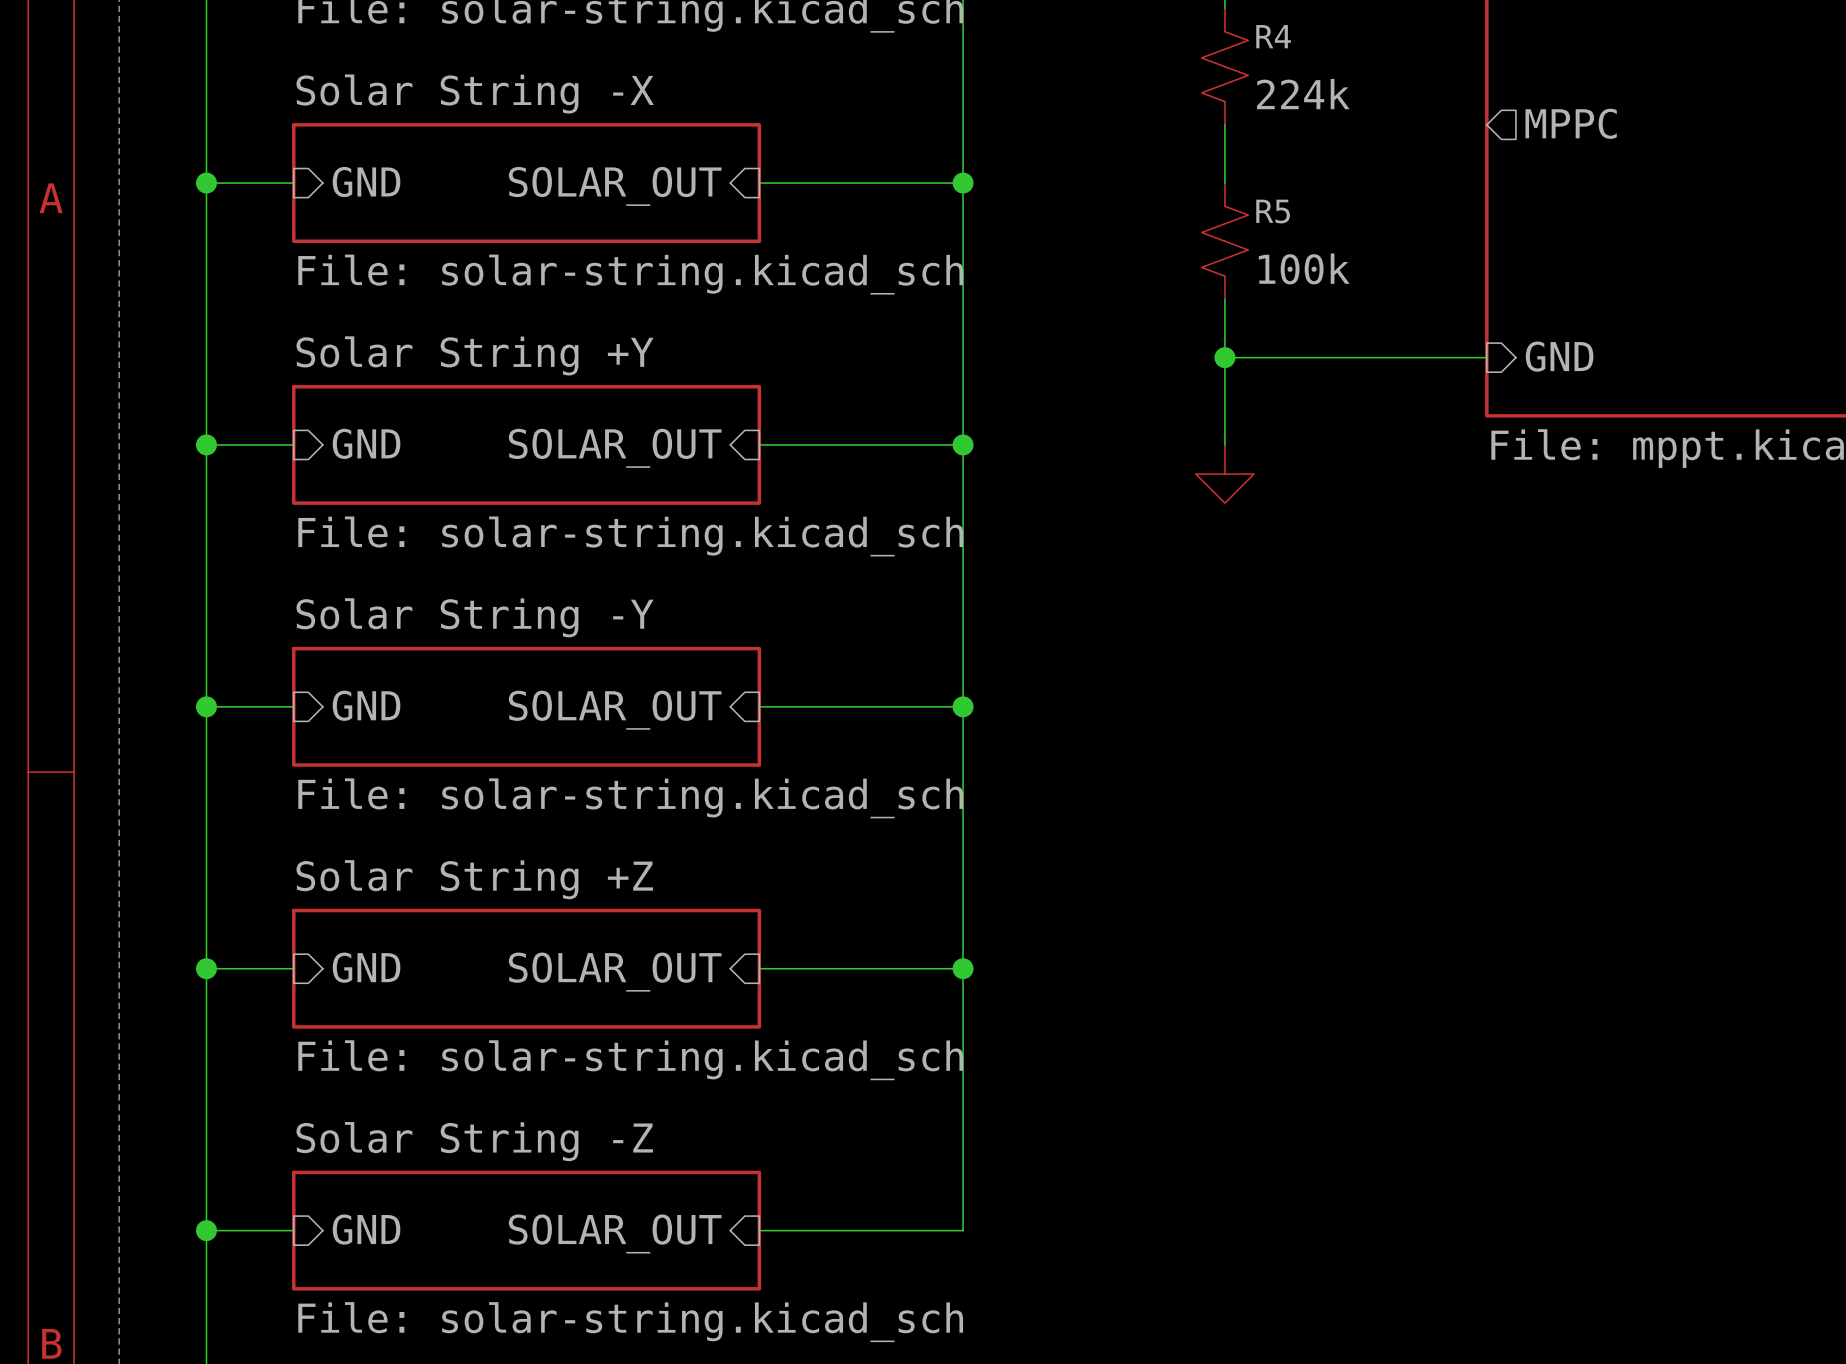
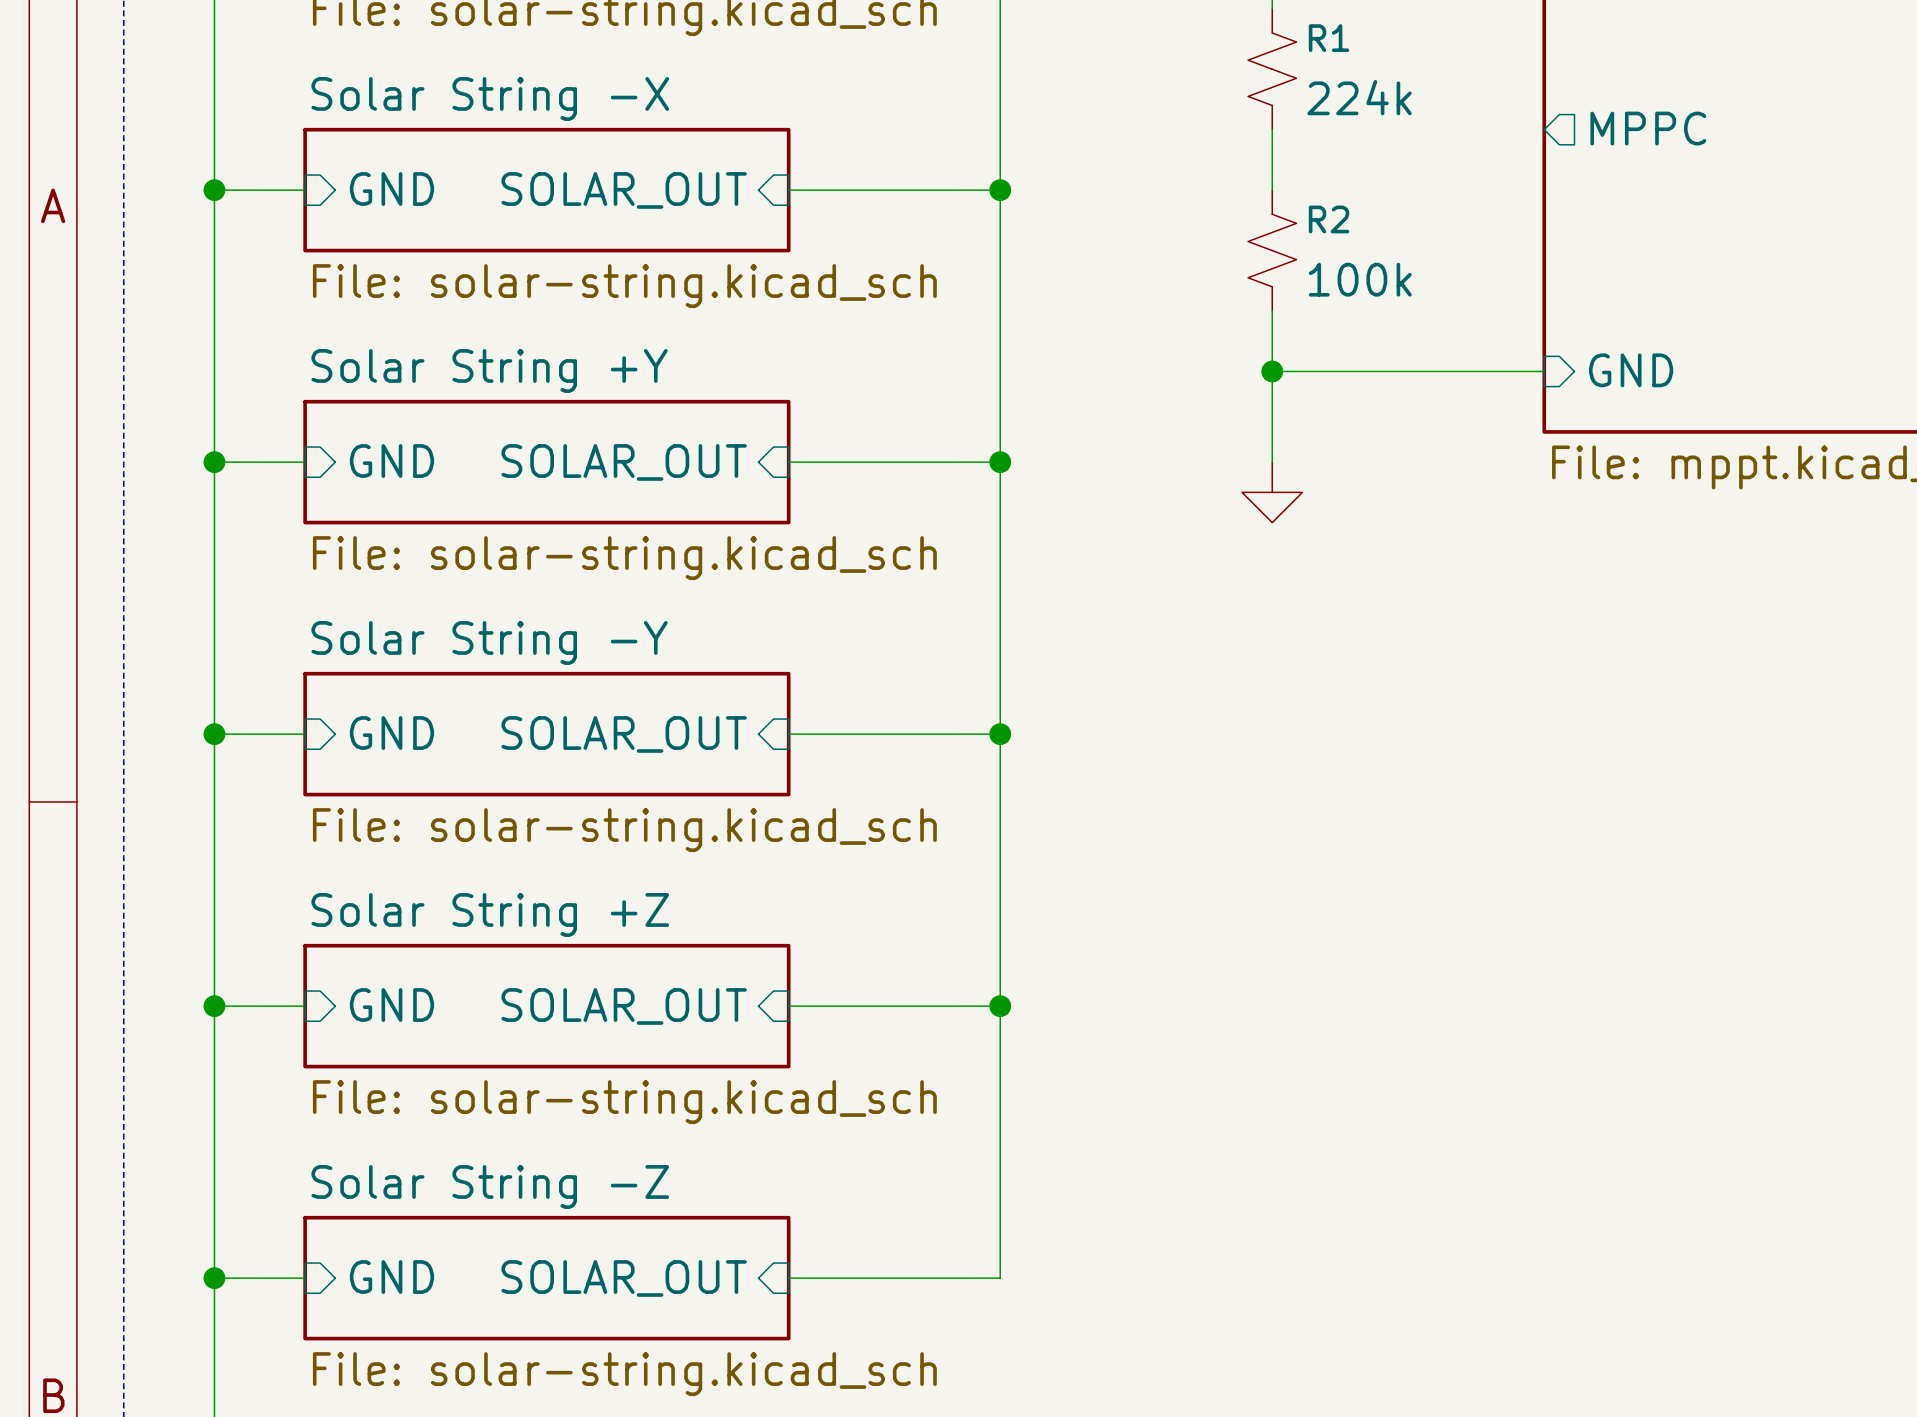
R4 name: R4 (1273, 36) -> R1 (1329, 38)
R5 name: R5 (1273, 211) -> R2 (1329, 219)

